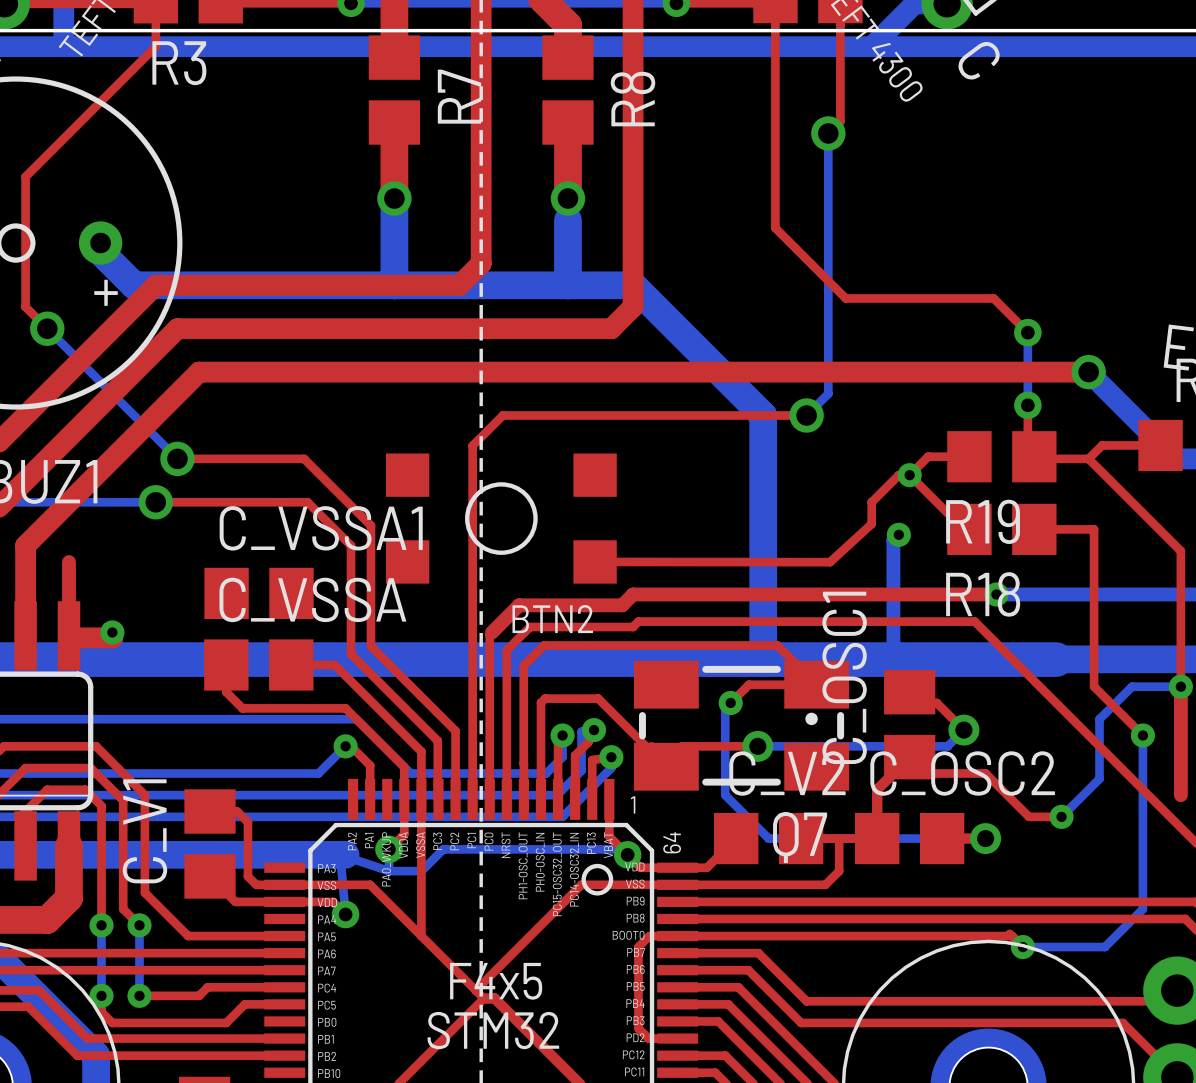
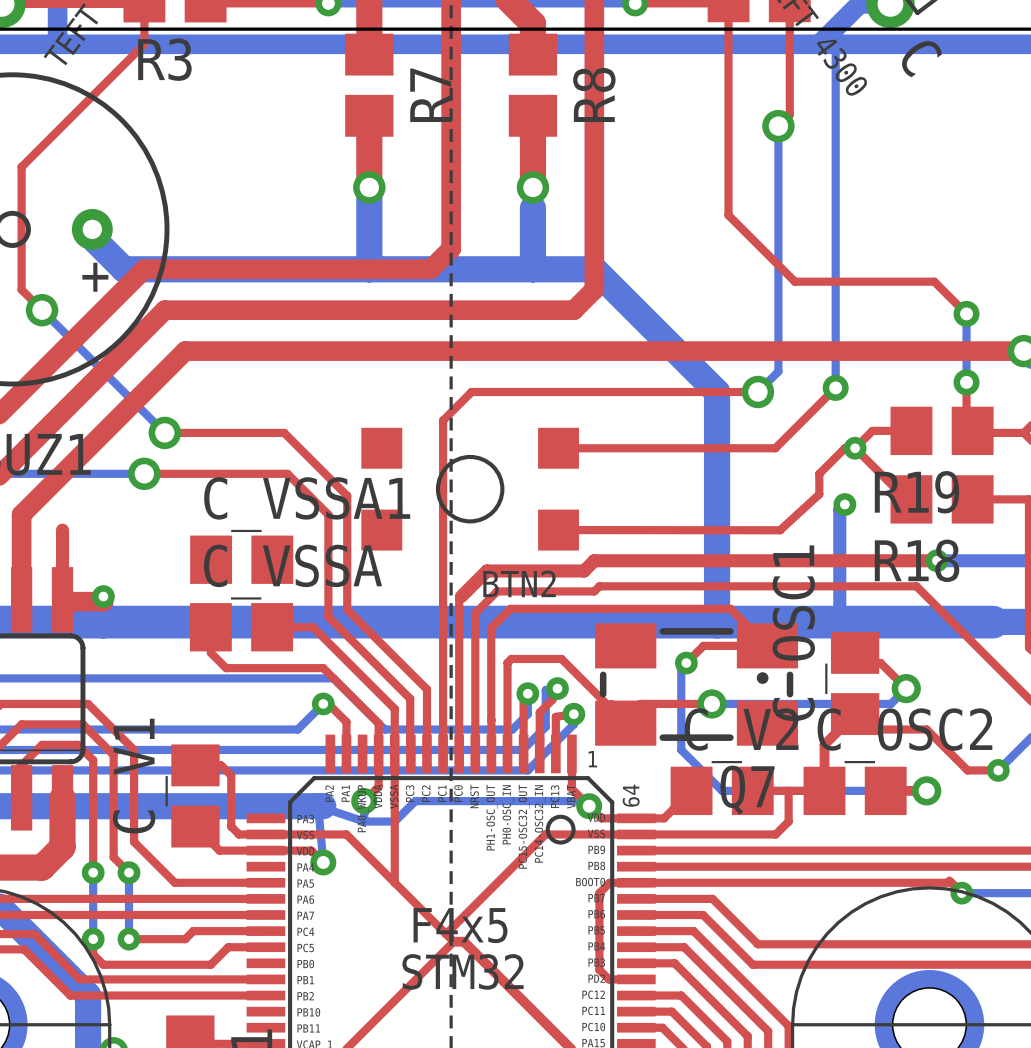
bottom track: none -> (835, 44) (835, 387)
top track: none -> (835, 387) (775, 448) (558, 448)
via: none -> (835, 387)

